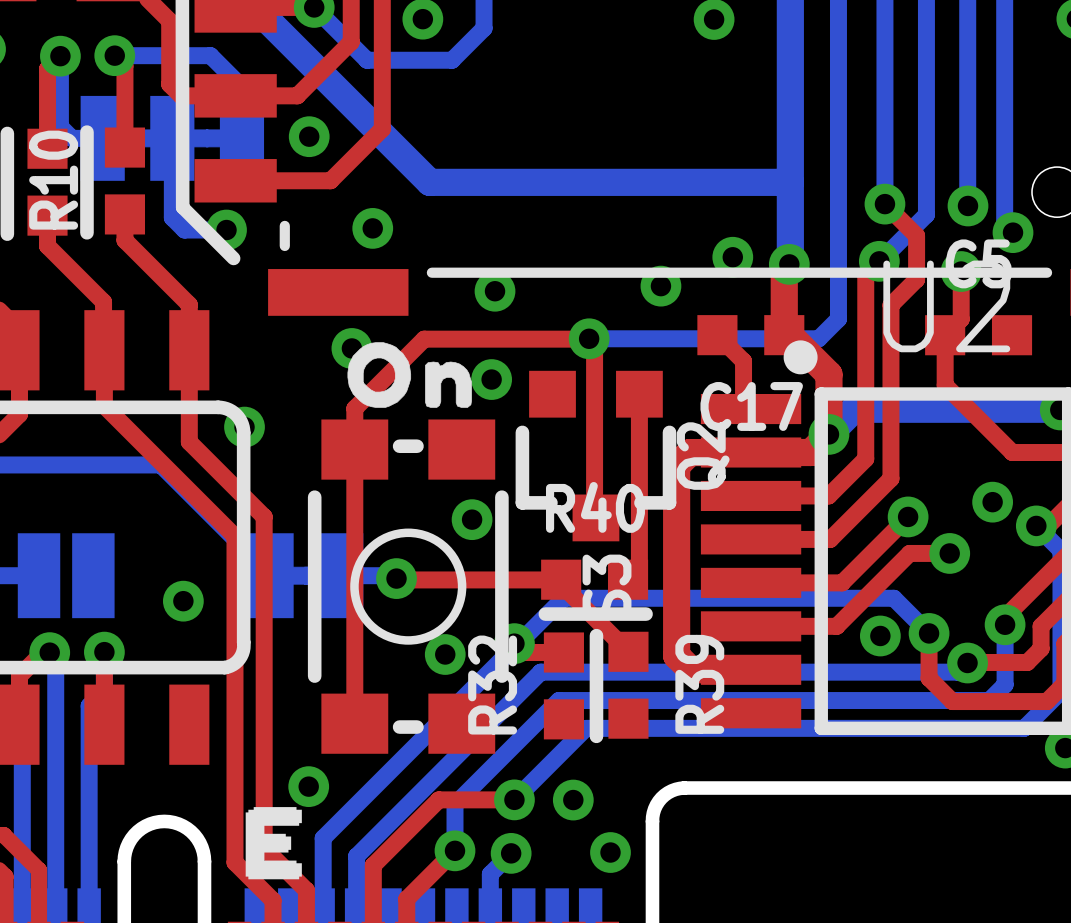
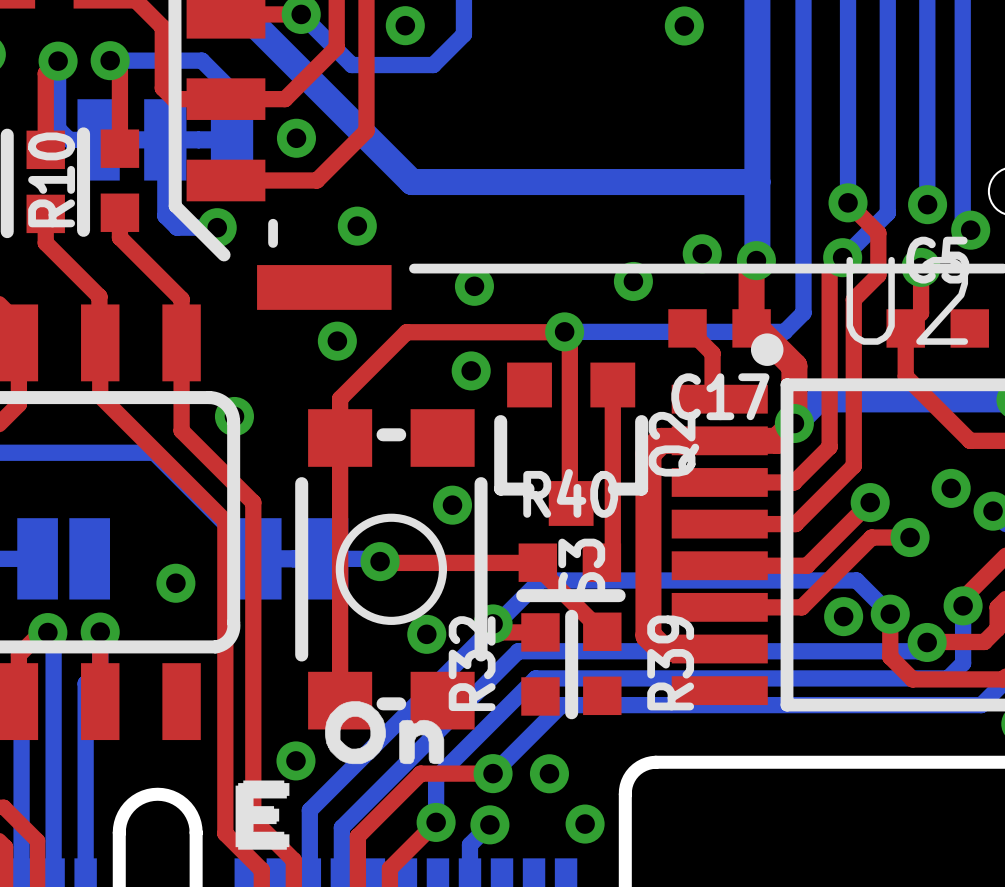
drawing position: (409, 375) -> (384, 732)

